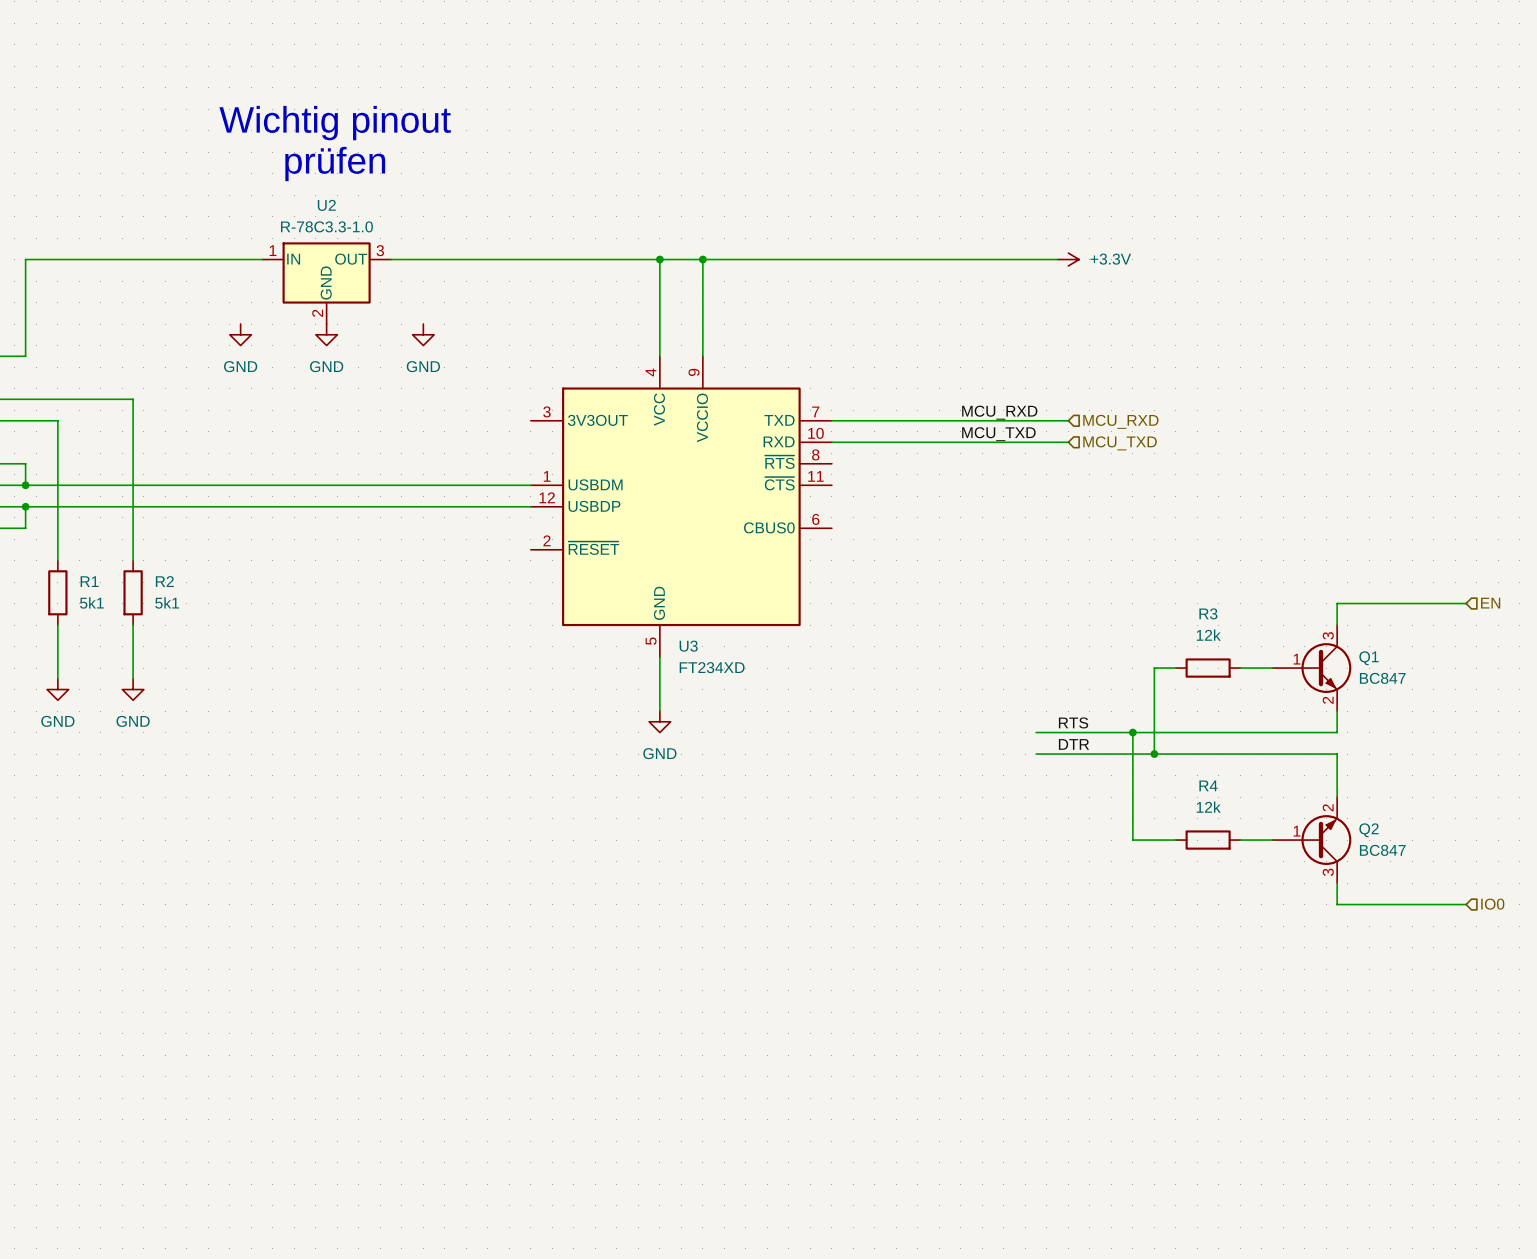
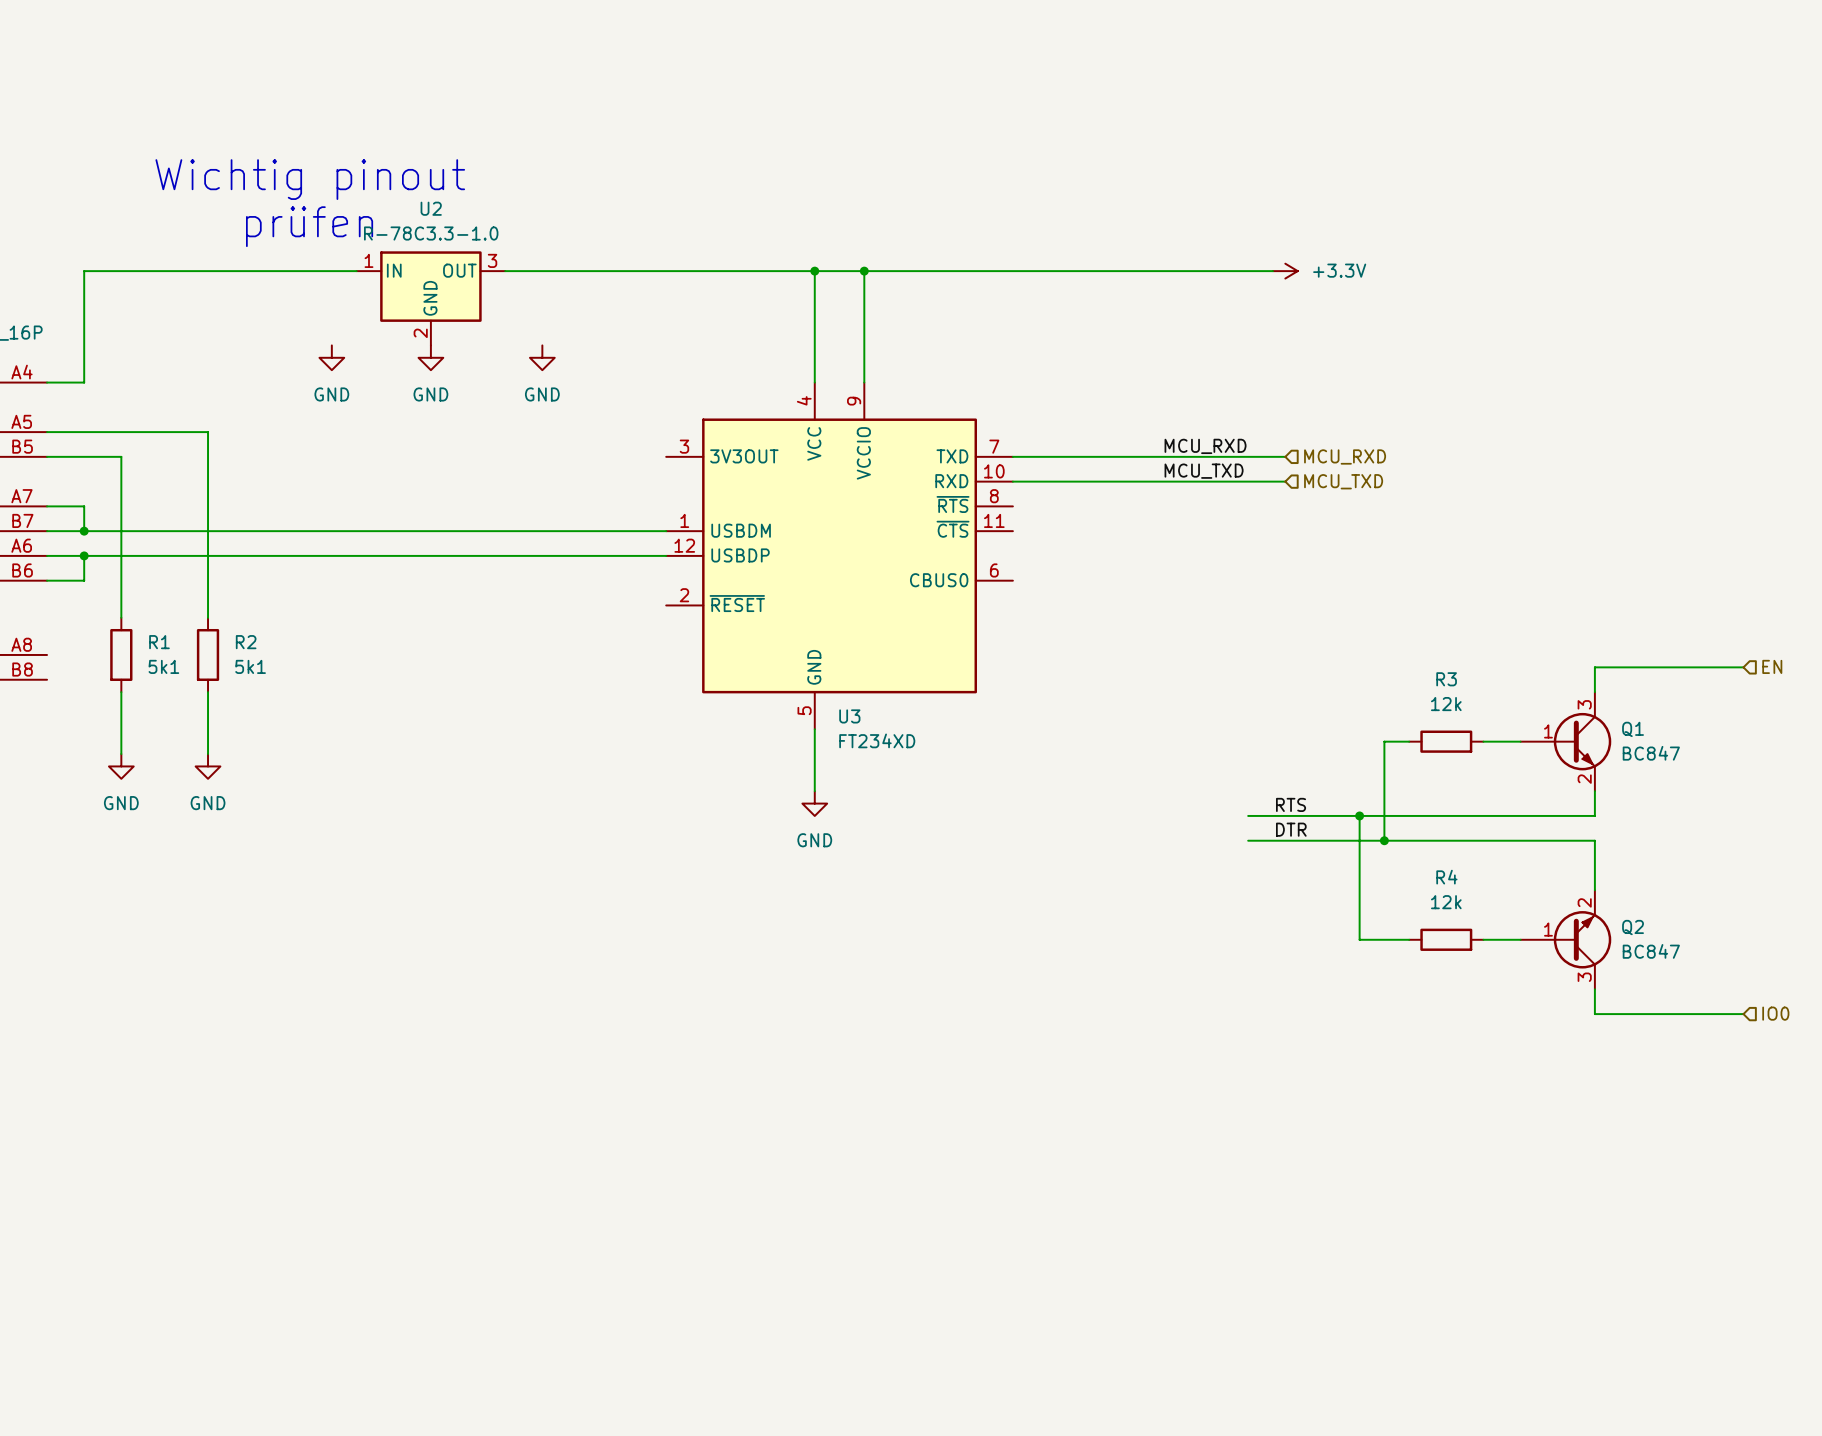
text position: Wichtig pinout (335, 123) -> Wichtig pinout (310, 179)
text position: prüfen (335, 163) -> prüfen (309, 226)

